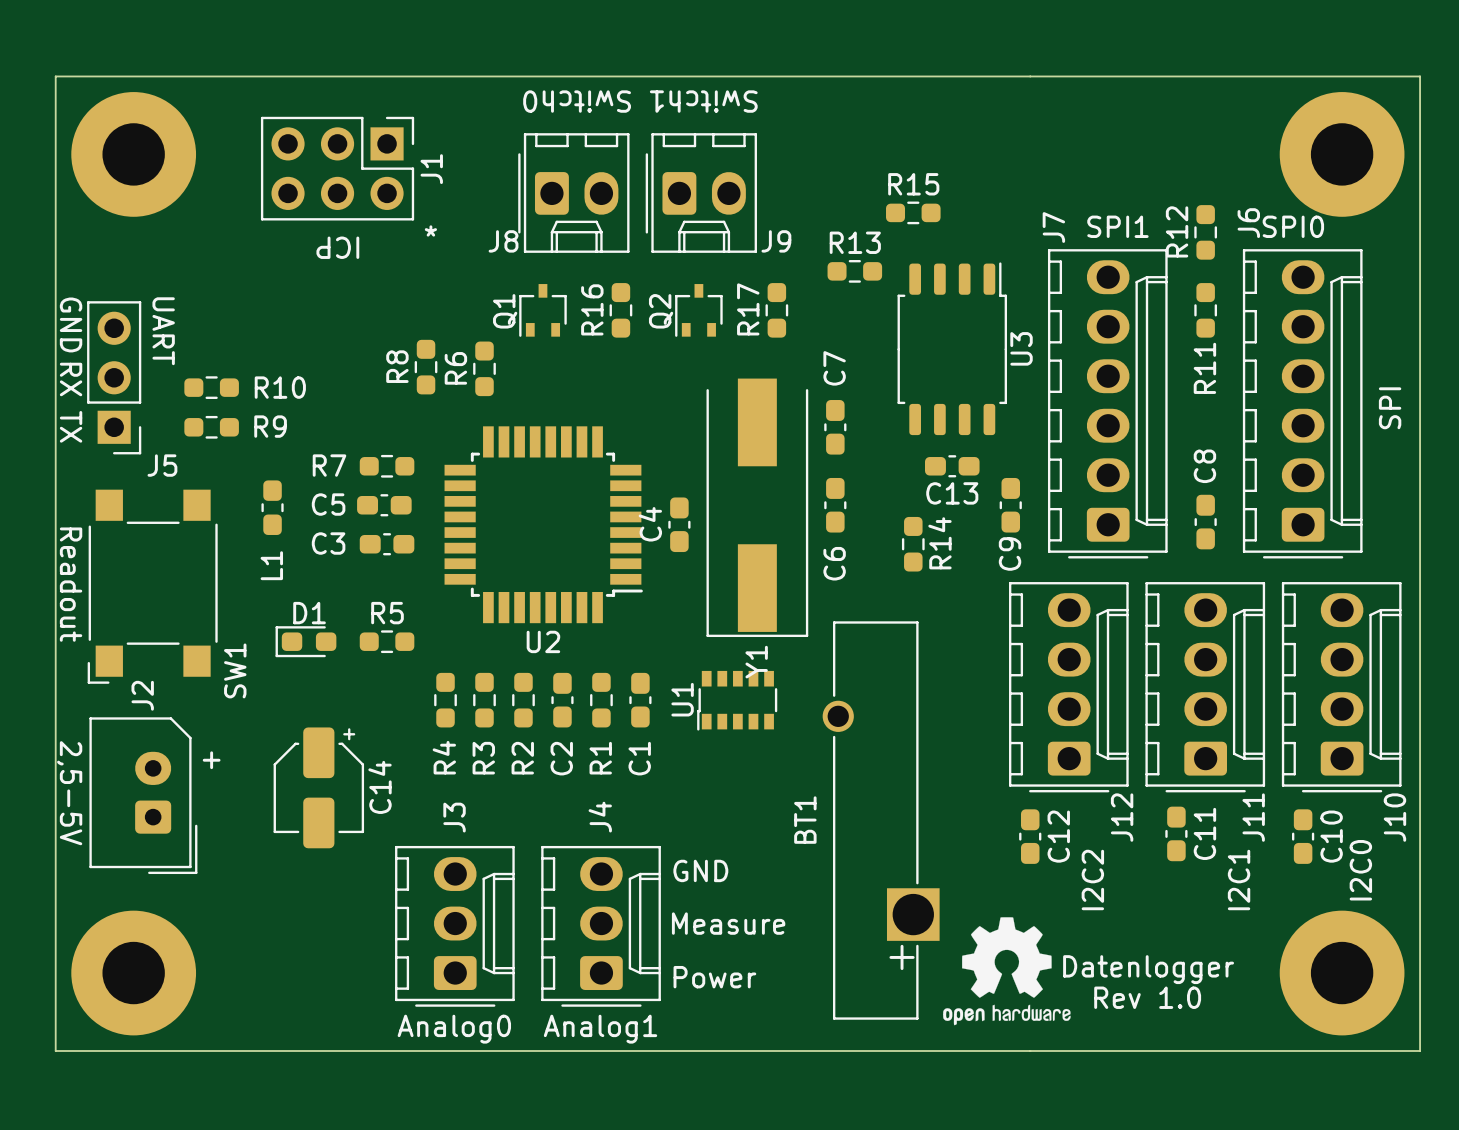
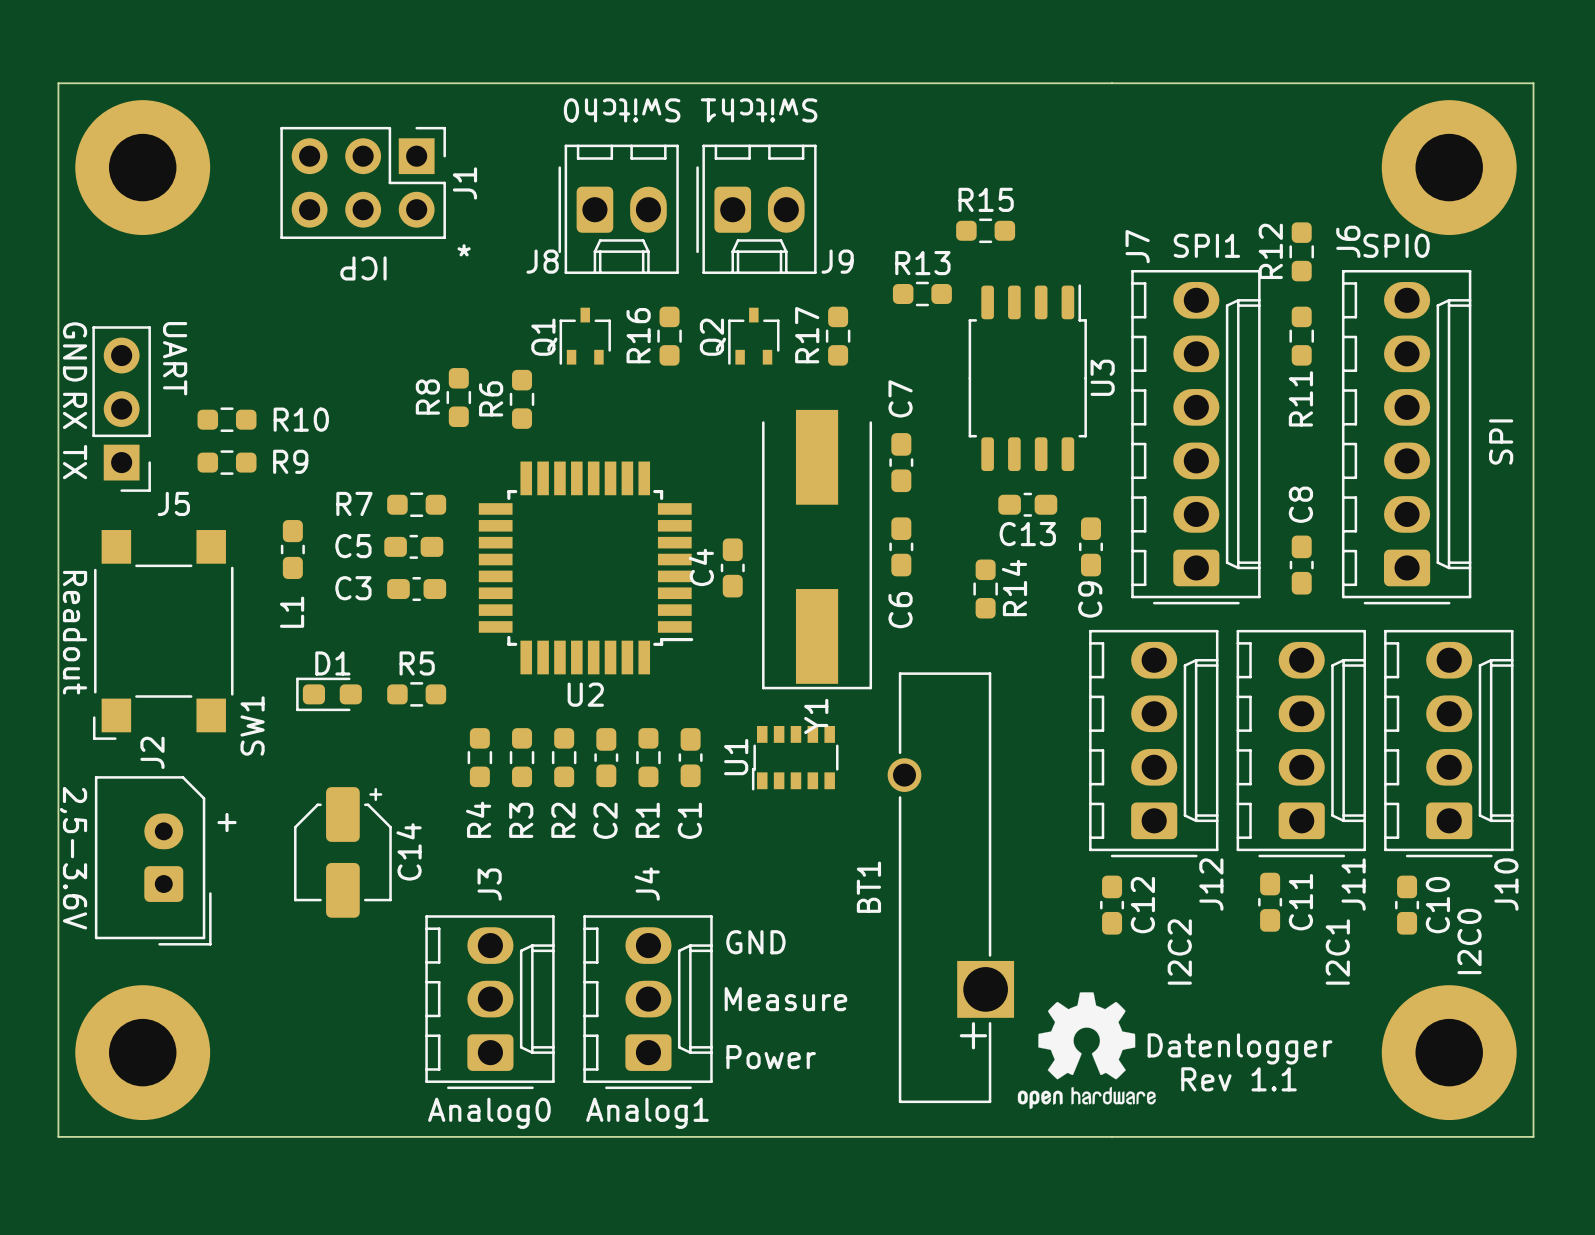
text: 2,5-5V (69, 793) -> 2,5-3.6V (73, 858)
text: Rev 1.0 (1147, 997) -> Rev 1.1 (1238, 1079)

